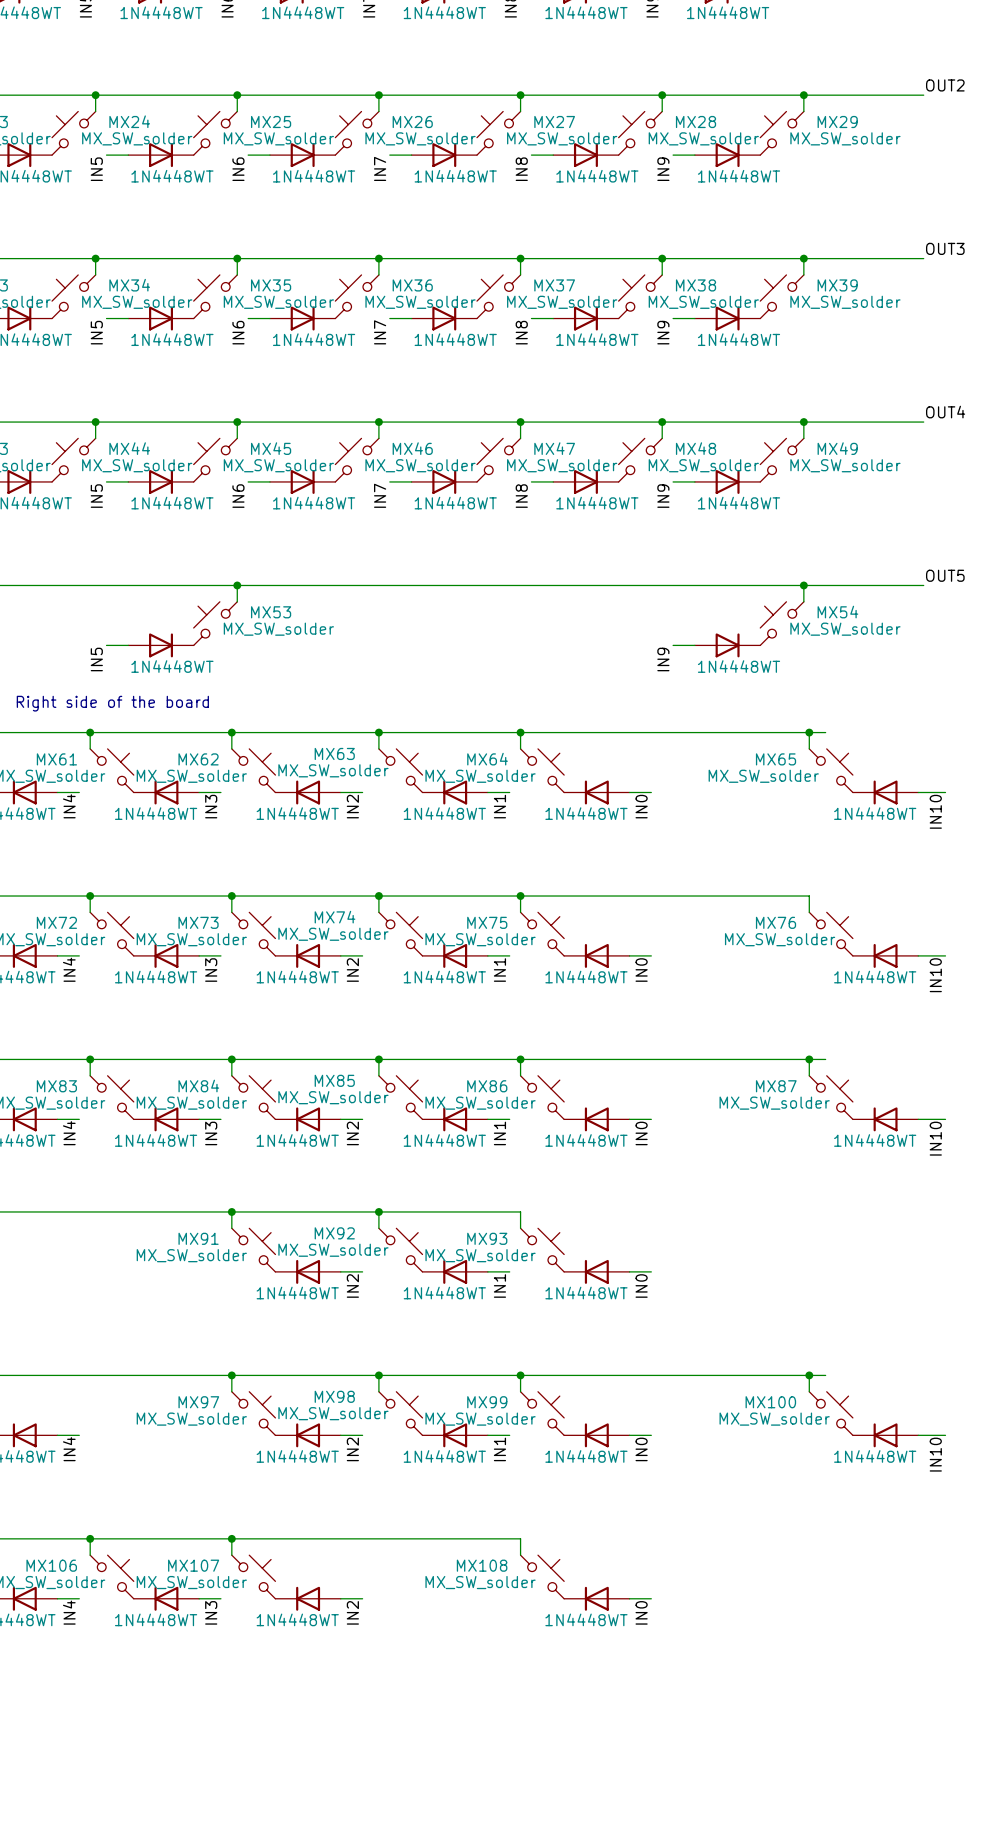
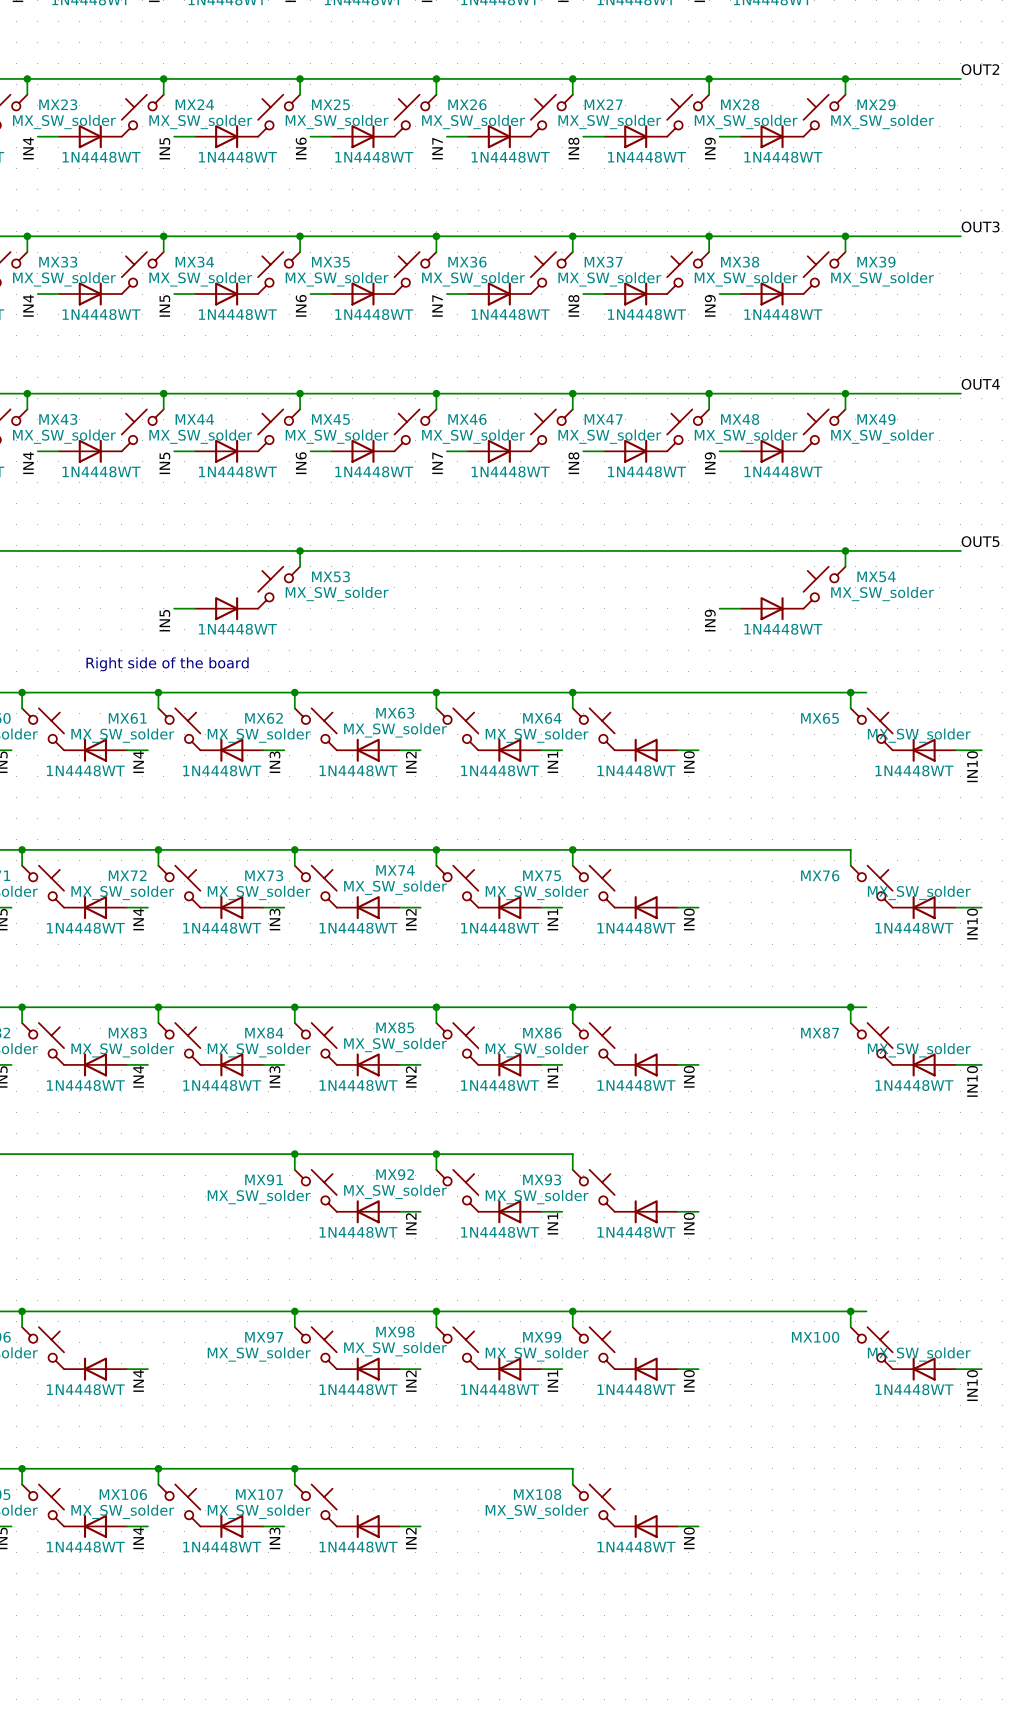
MX65 value position: MX_SW_solder (763, 776) -> MX_SW_solder (919, 735)
MX76 value position: MX_SW_solder (780, 939) -> MX_SW_solder (919, 892)
MX87 value position: MX_SW_solder (774, 1103) -> MX_SW_solder (919, 1050)
MX100 value position: MX_SW_solder (774, 1419) -> MX_SW_solder (919, 1354)

